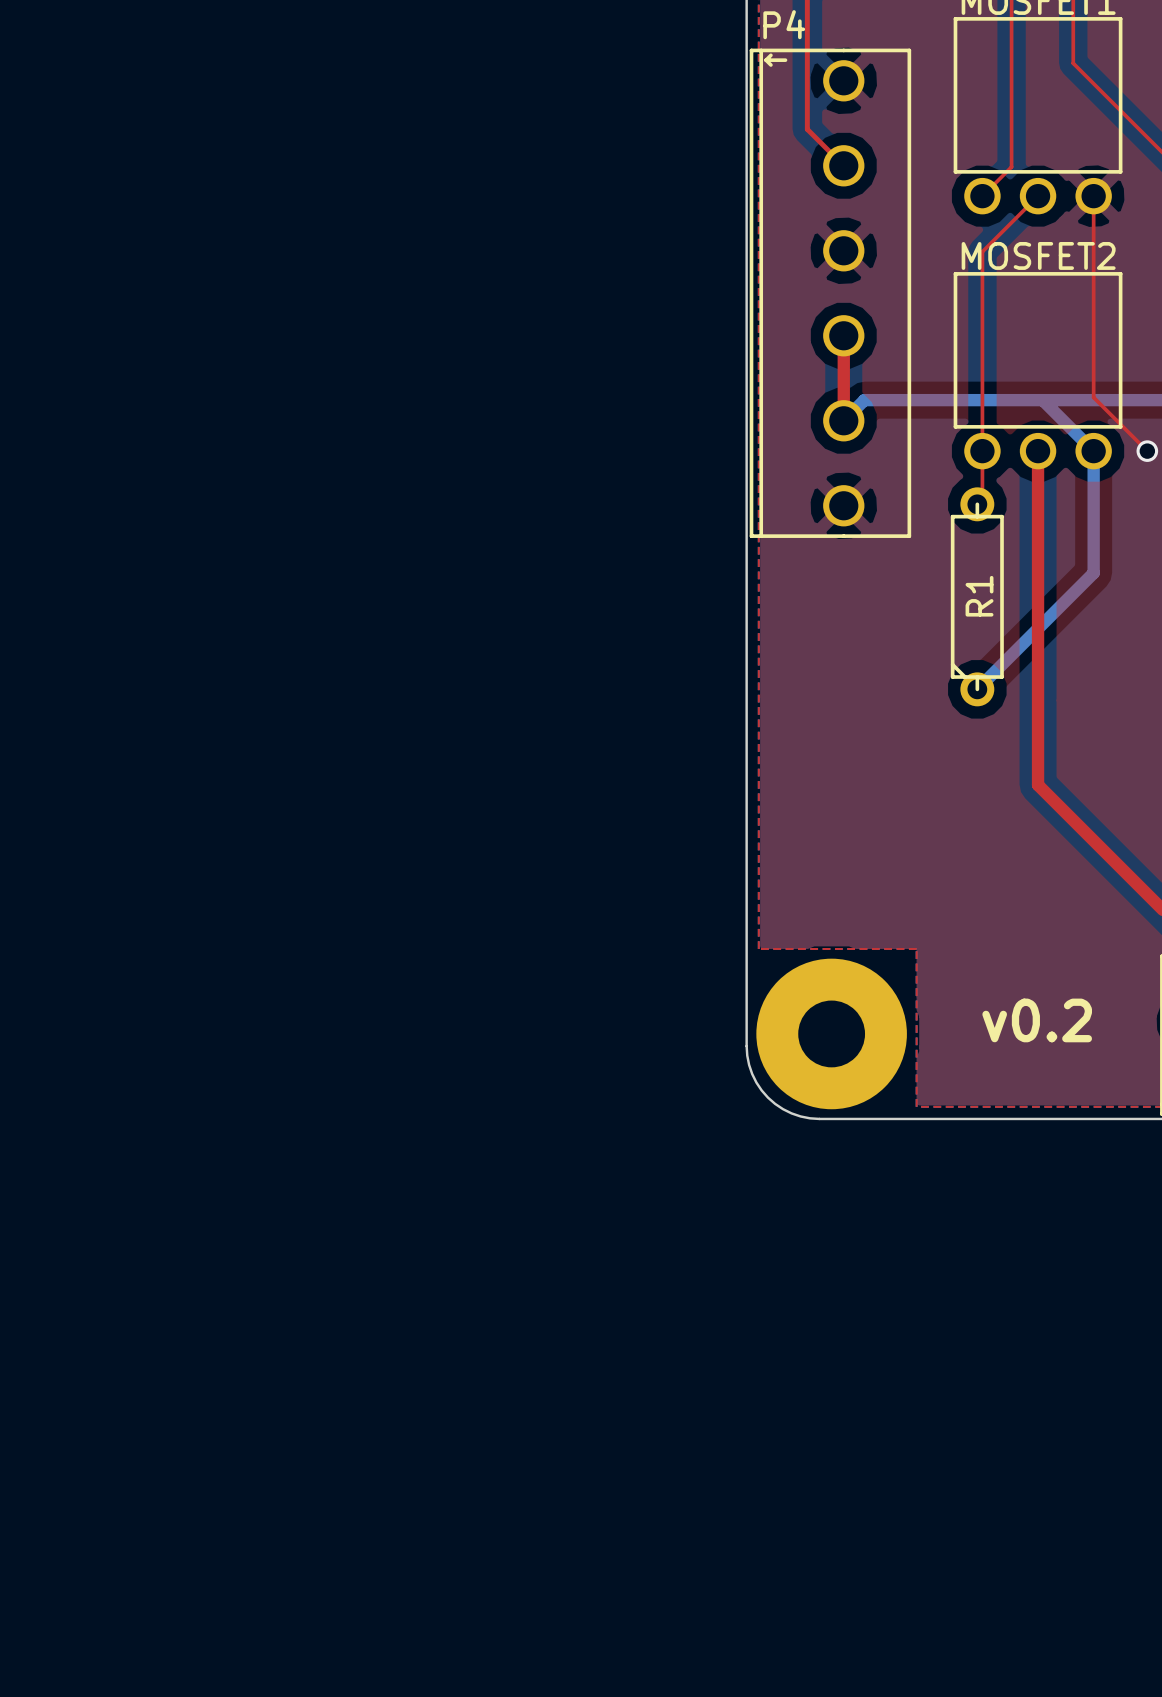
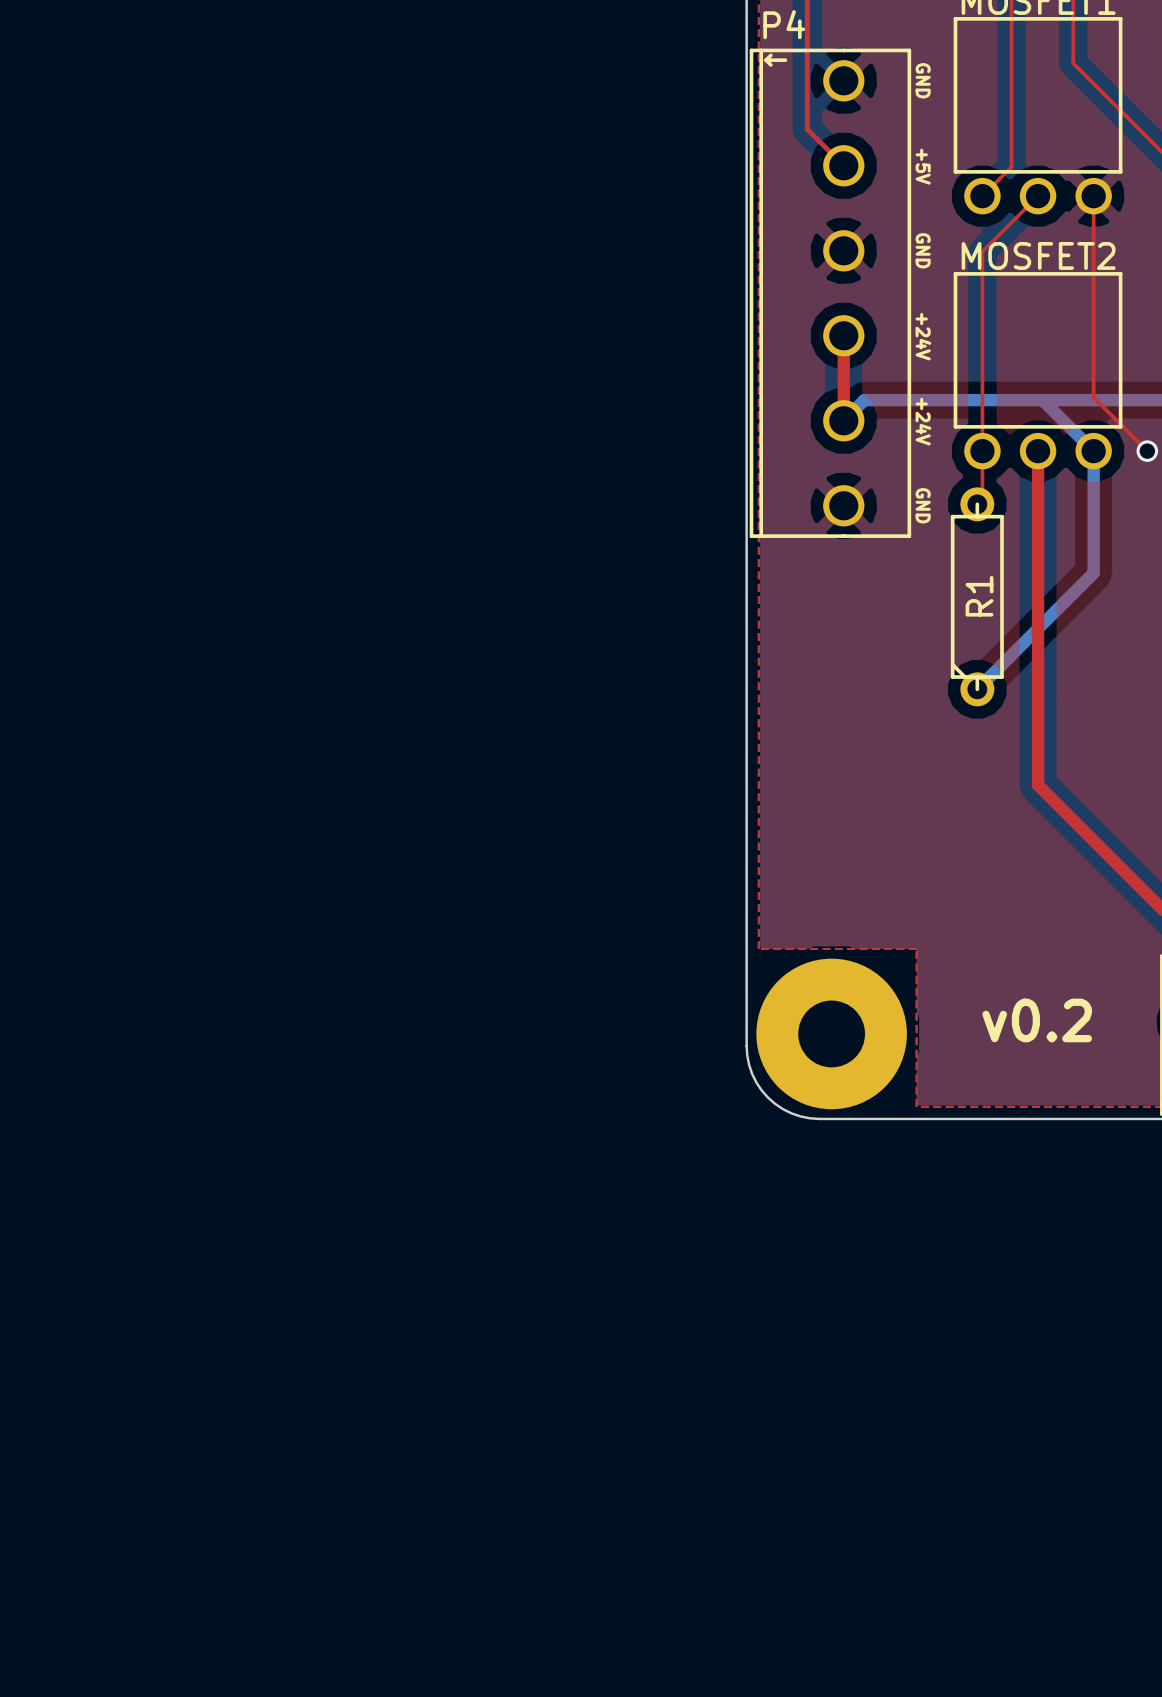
text: none -> GND (923, 80)
text: none -> +5V (923, 166)
text: none -> GND (923, 250)
text: none -> +24V (923, 336)
text: none -> +24V (923, 421)
text: none -> GND (923, 505)

